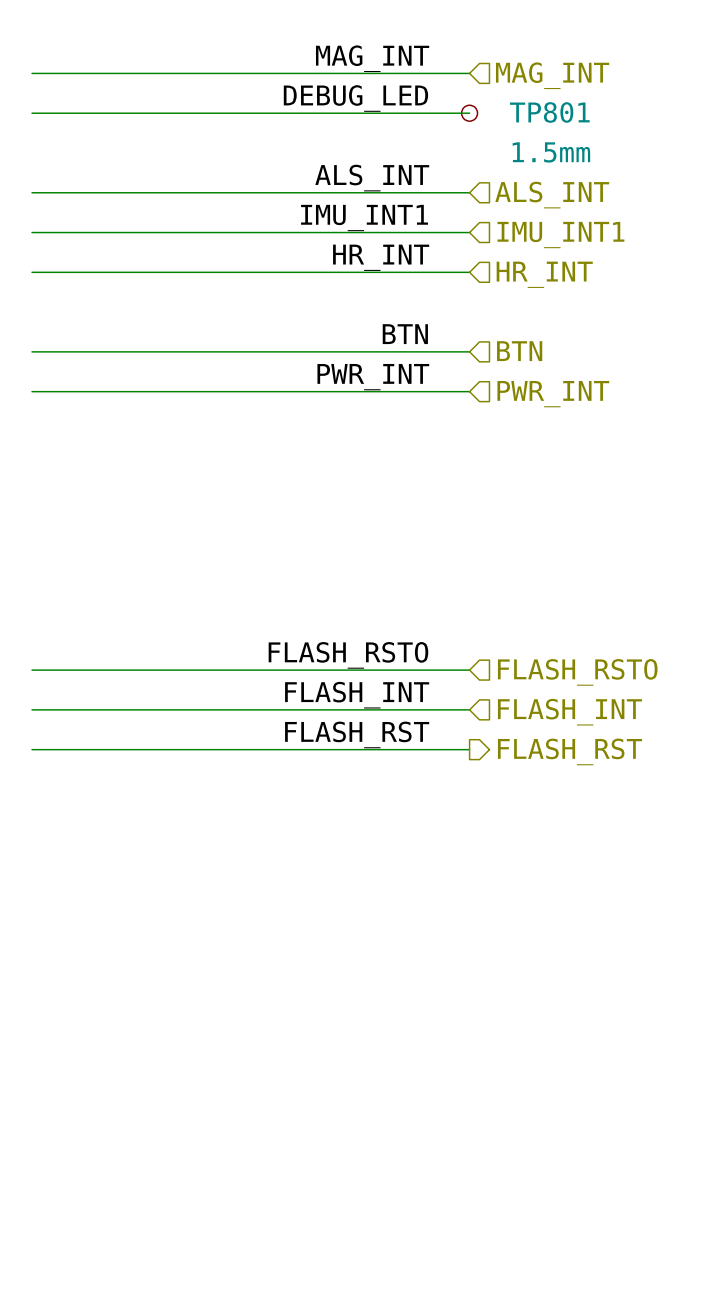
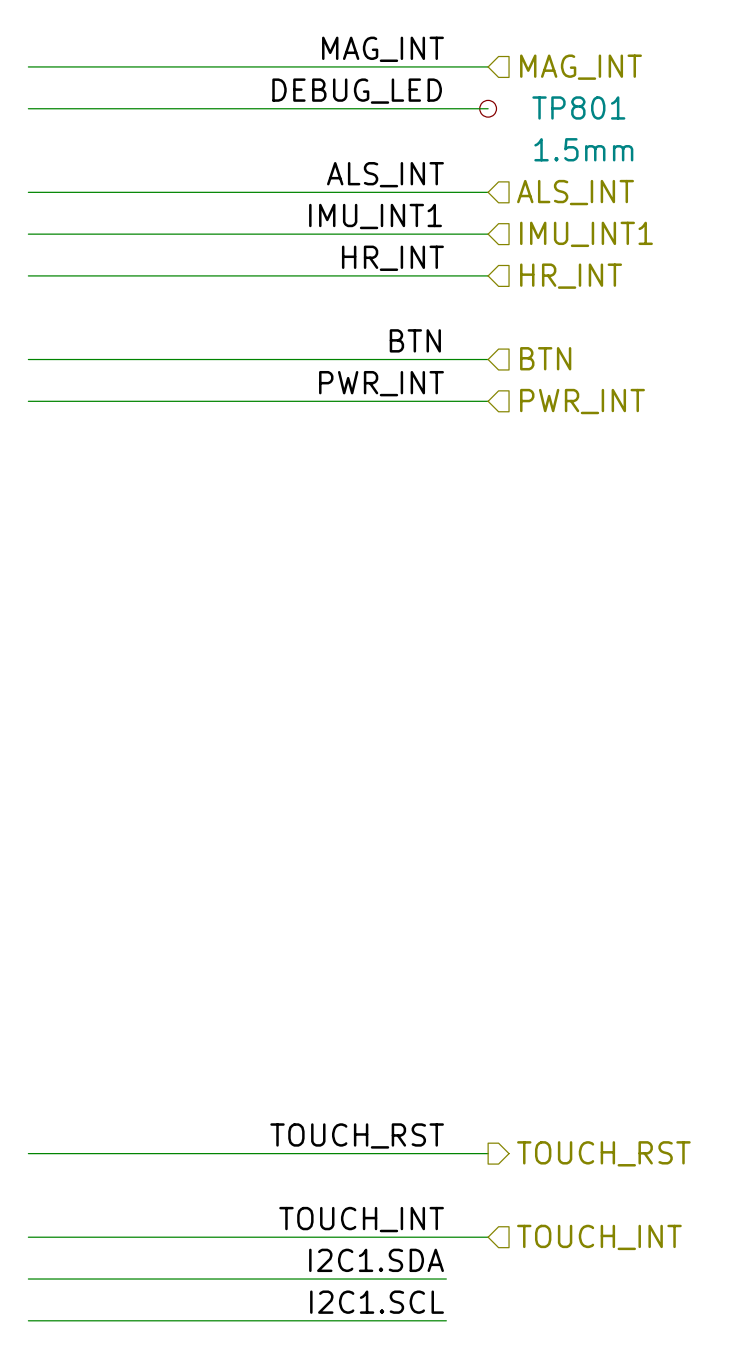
label: FLASH_RSTO (348, 655) -> none
wire: (32, 670) (469, 670) -> none
hierarchical label: FLASH_RSTO (577, 672) -> none
label: FLASH_INT (357, 695) -> none
wire: (32, 709) (469, 709) -> none
hierarchical label: FLASH_INT (569, 712) -> none
label: FLASH_RST (357, 734) -> none
wire: (32, 749) (469, 749) -> (28, 1153) (488, 1153)
hierarchical label: FLASH_RST (569, 751) -> none
label: none -> TOUCH_RST (357, 1135)
hierarchical label: none -> TOUCH_RST (603, 1153)
label: none -> TOUCH_INT (361, 1219)
wire: none -> (28, 1237) (488, 1237)
hierarchical label: none -> TOUCH_INT (599, 1237)
label: none -> I2C1.SDA (376, 1260)
wire: none -> (28, 1279) (446, 1279)
label: none -> I2C1.SCL (377, 1302)
wire: none -> (28, 1320) (446, 1320)

